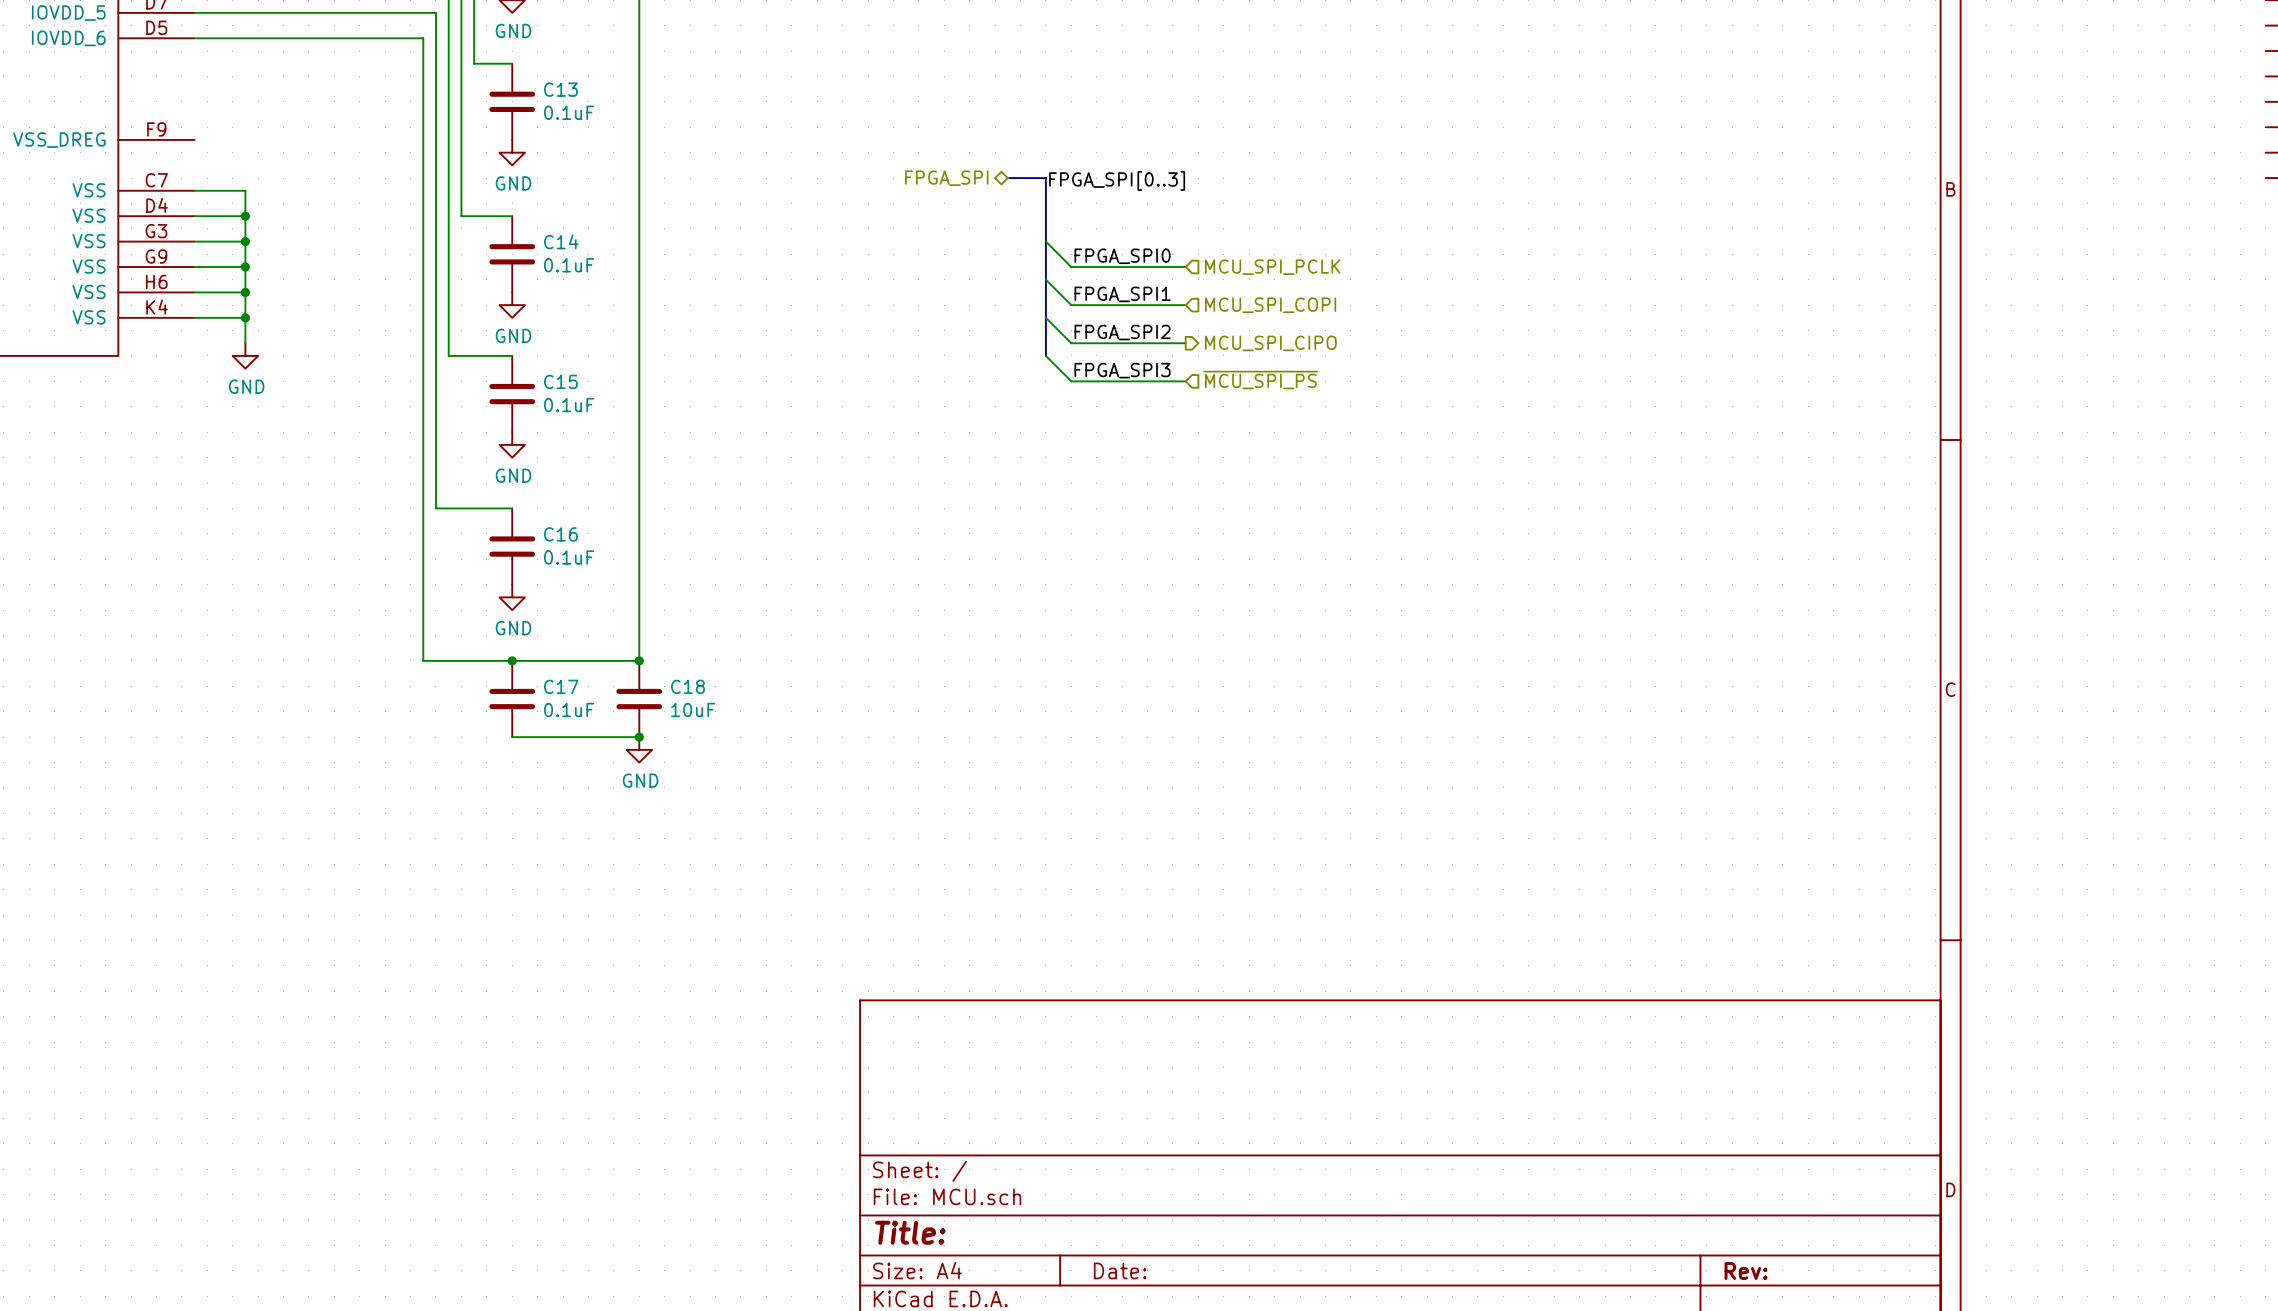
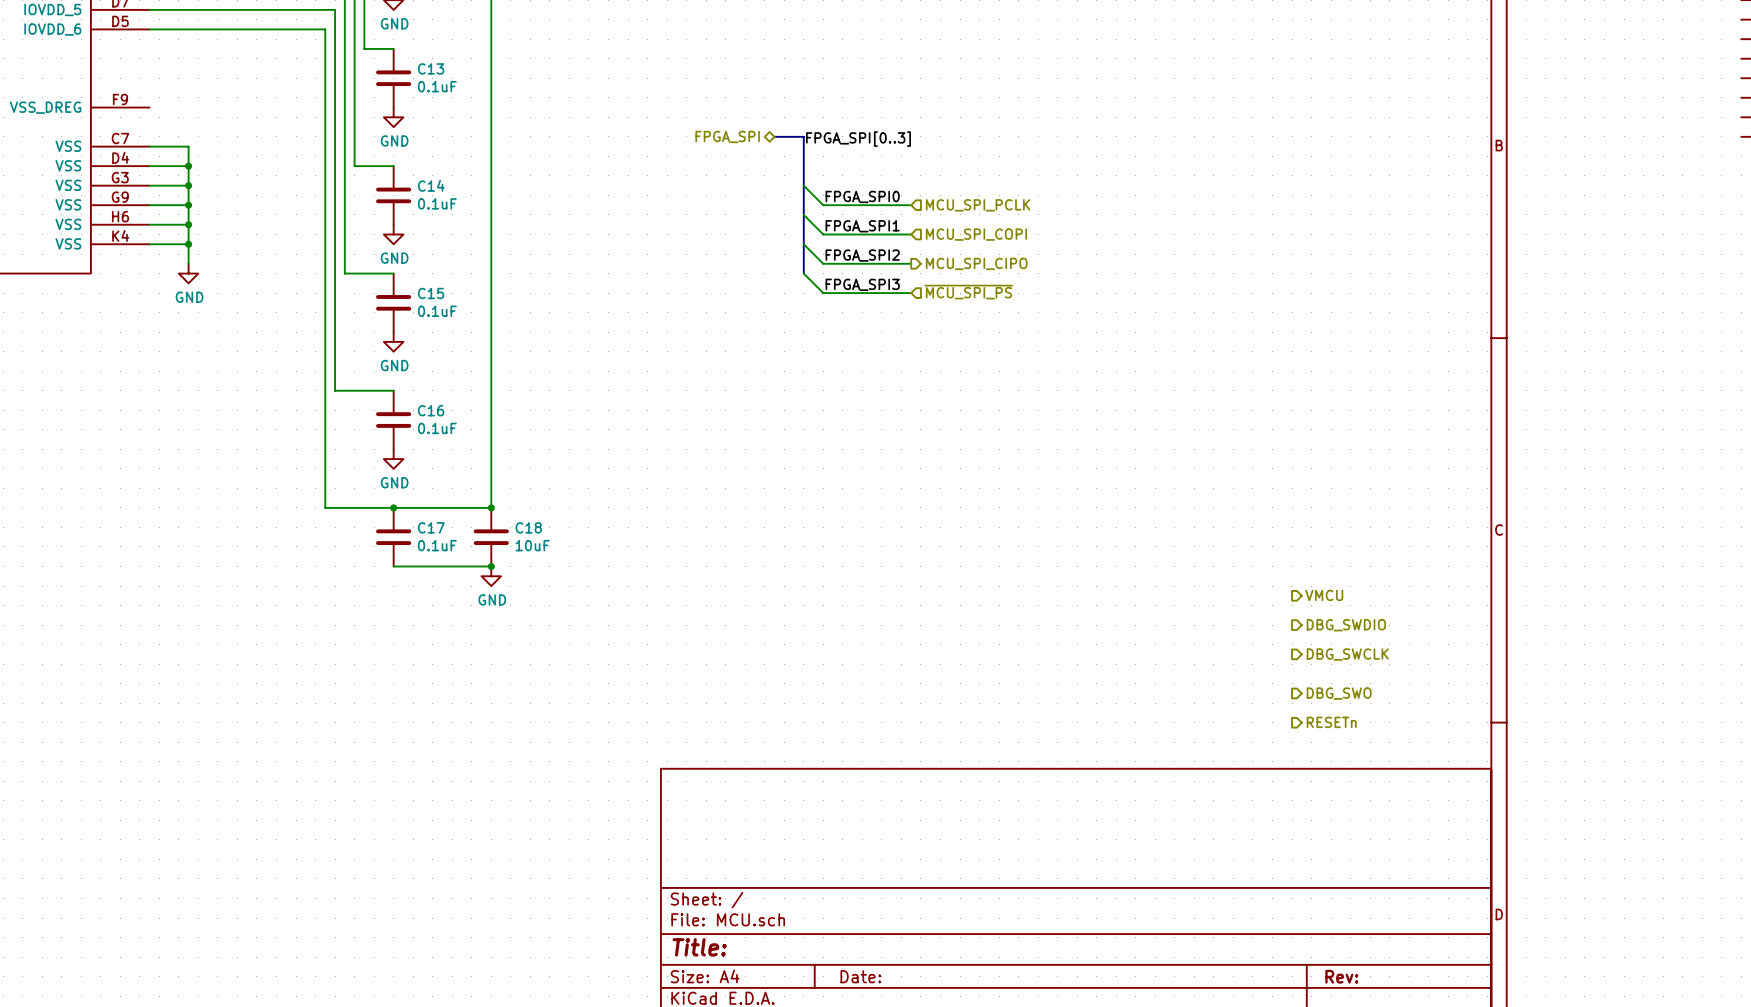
hierarchical label: none -> VMCU (1324, 595)
hierarchical label: none -> DBG_SWDIO (1346, 625)
hierarchical label: none -> DBG_SWCLK (1347, 654)
hierarchical label: none -> DBG_SWO (1339, 693)
hierarchical label: none -> RESETn (1331, 722)

